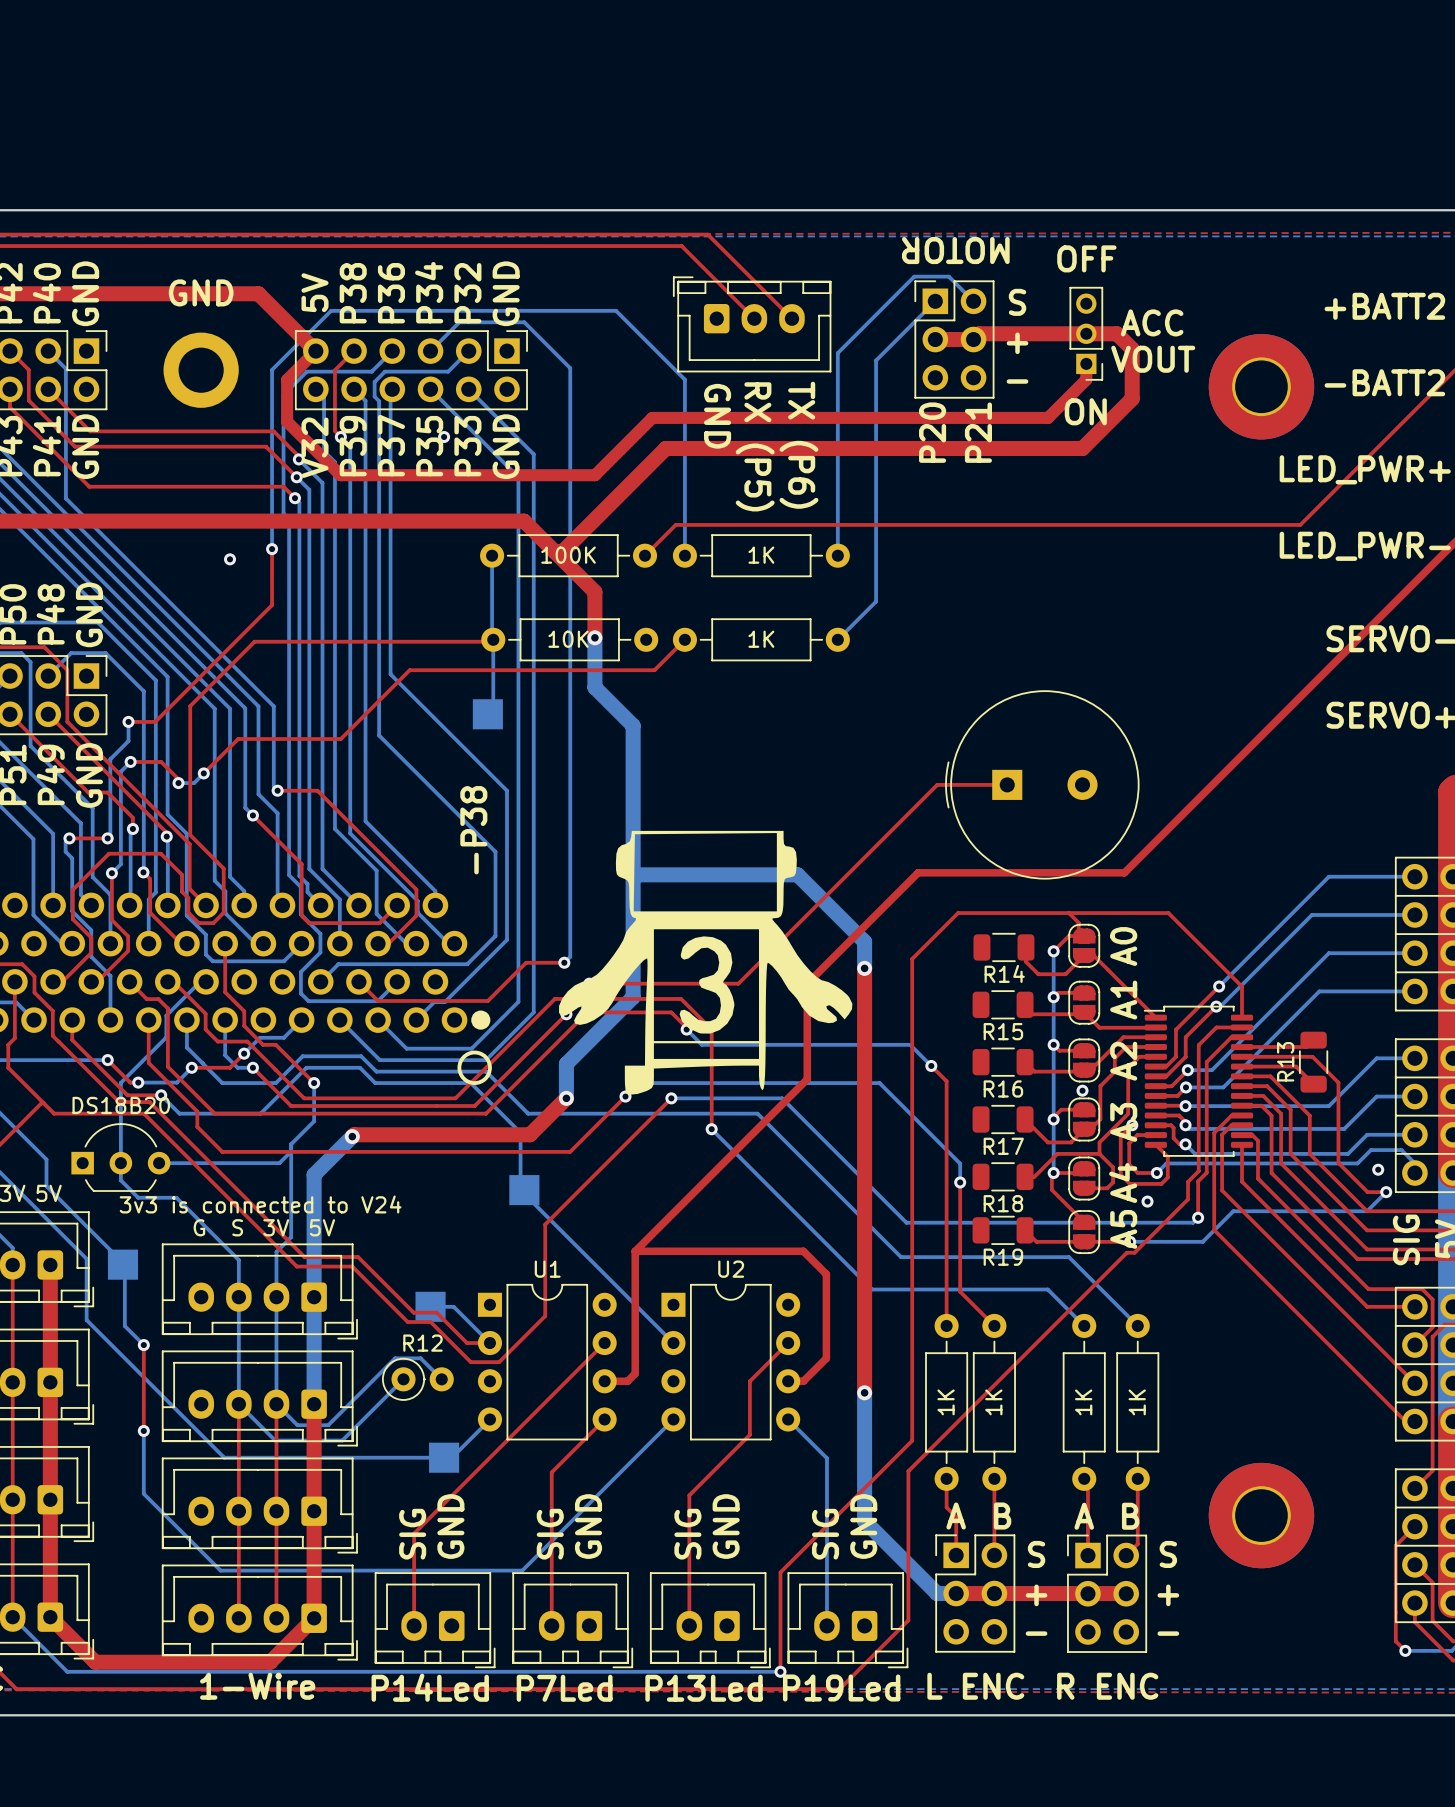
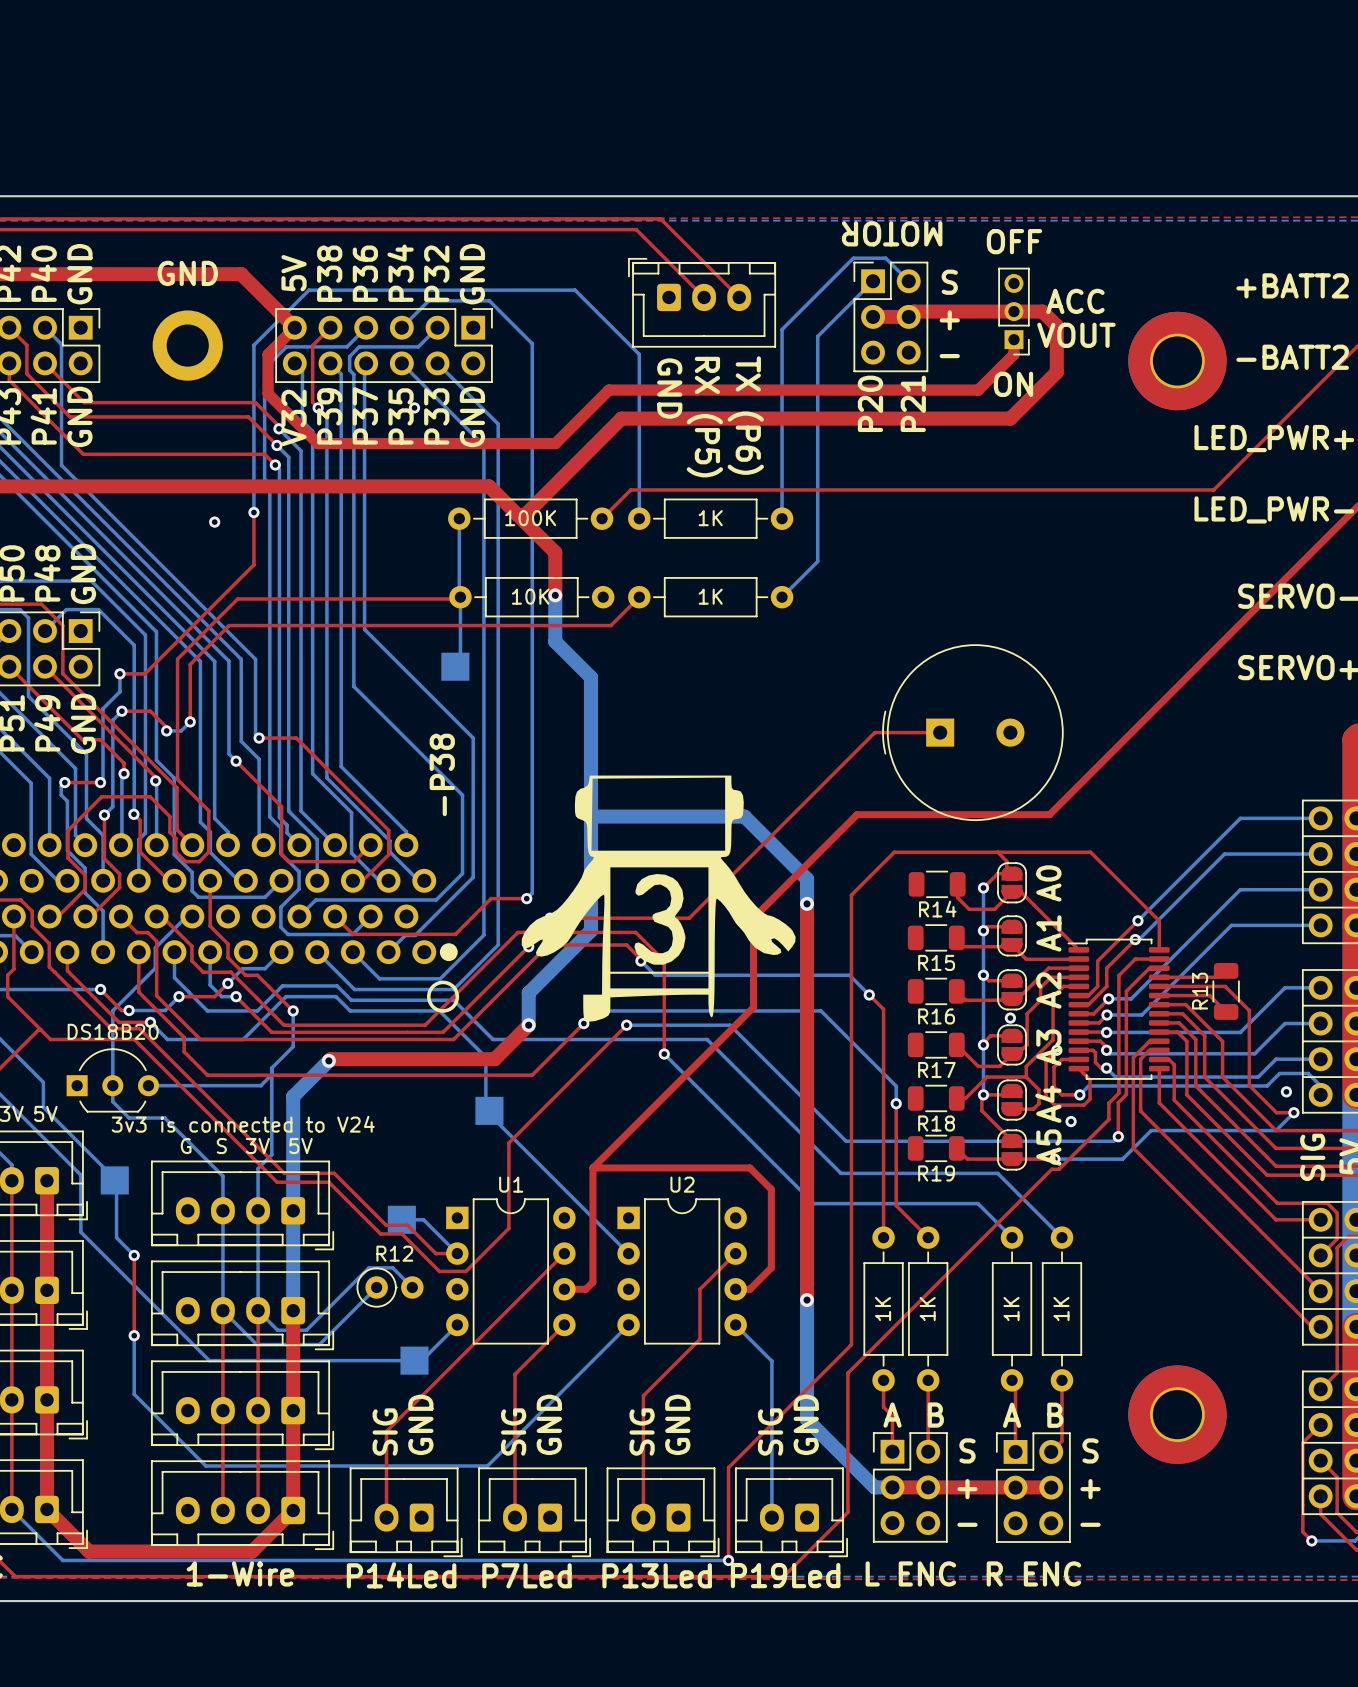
top track: (409, 670) (340, 739) (238, 739) (203, 773) -> (382, 625) (229, 625) (190, 664) (190, 721)

